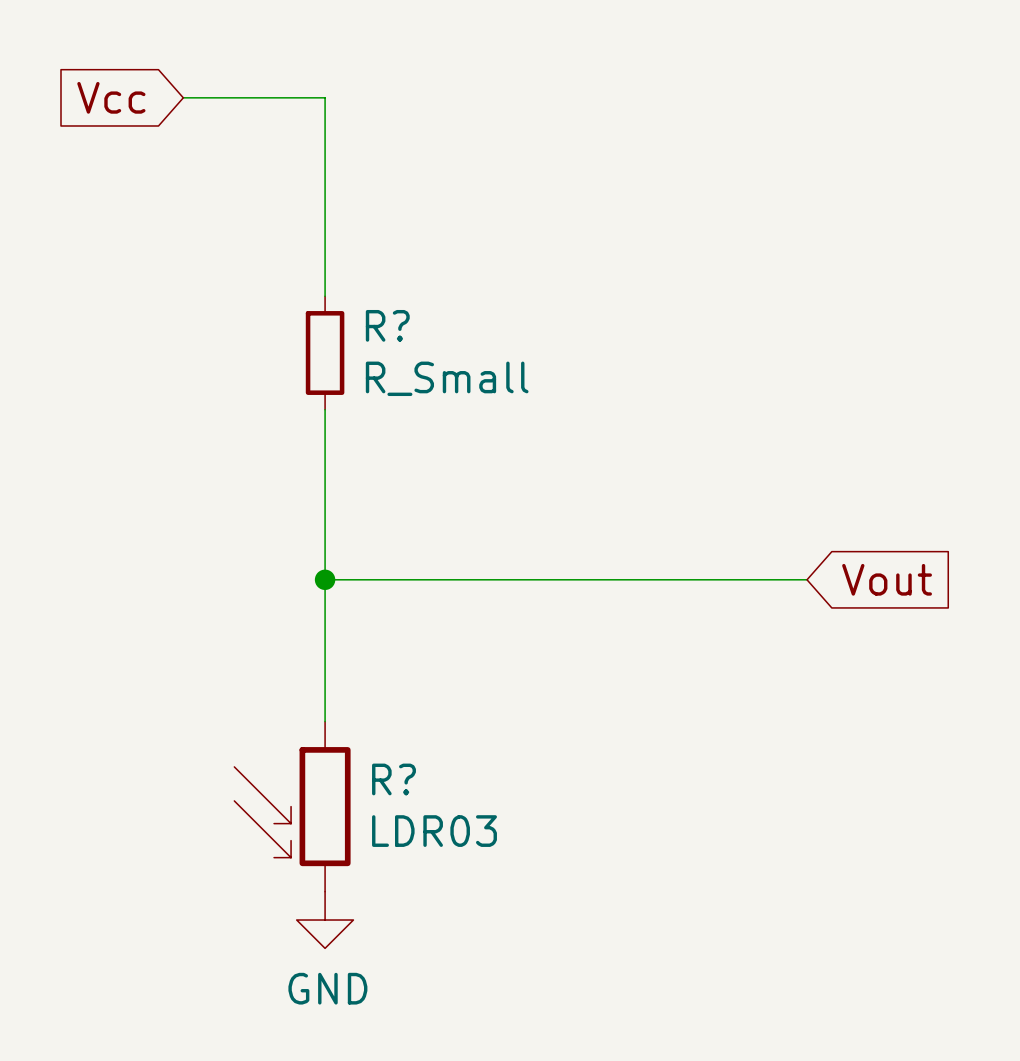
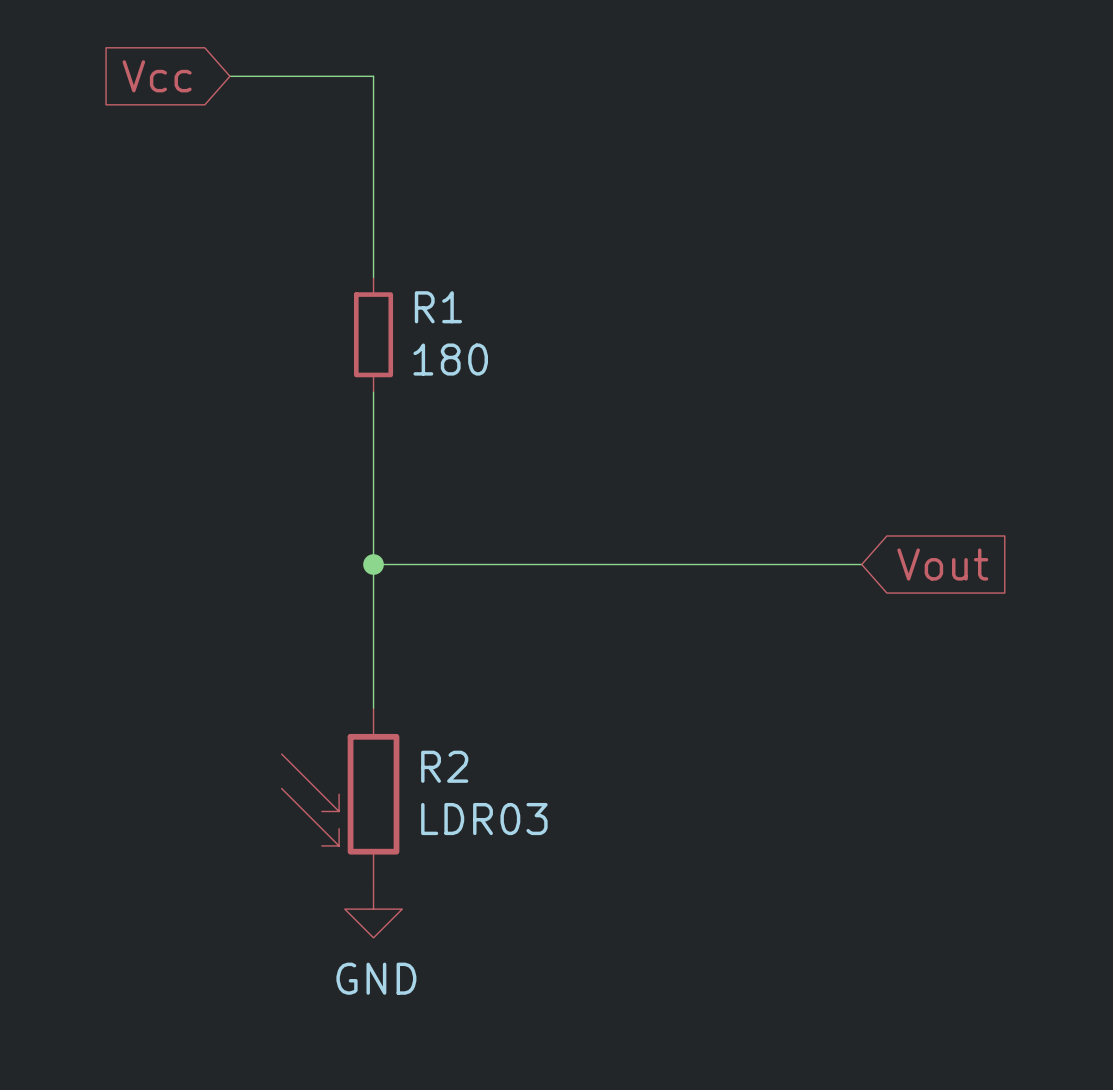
R? name: R? (387, 325) -> R1 (438, 307)
R? value: R_Small (447, 378) -> 180 (450, 359)
R? name: R? (394, 779) -> R2 (444, 766)

